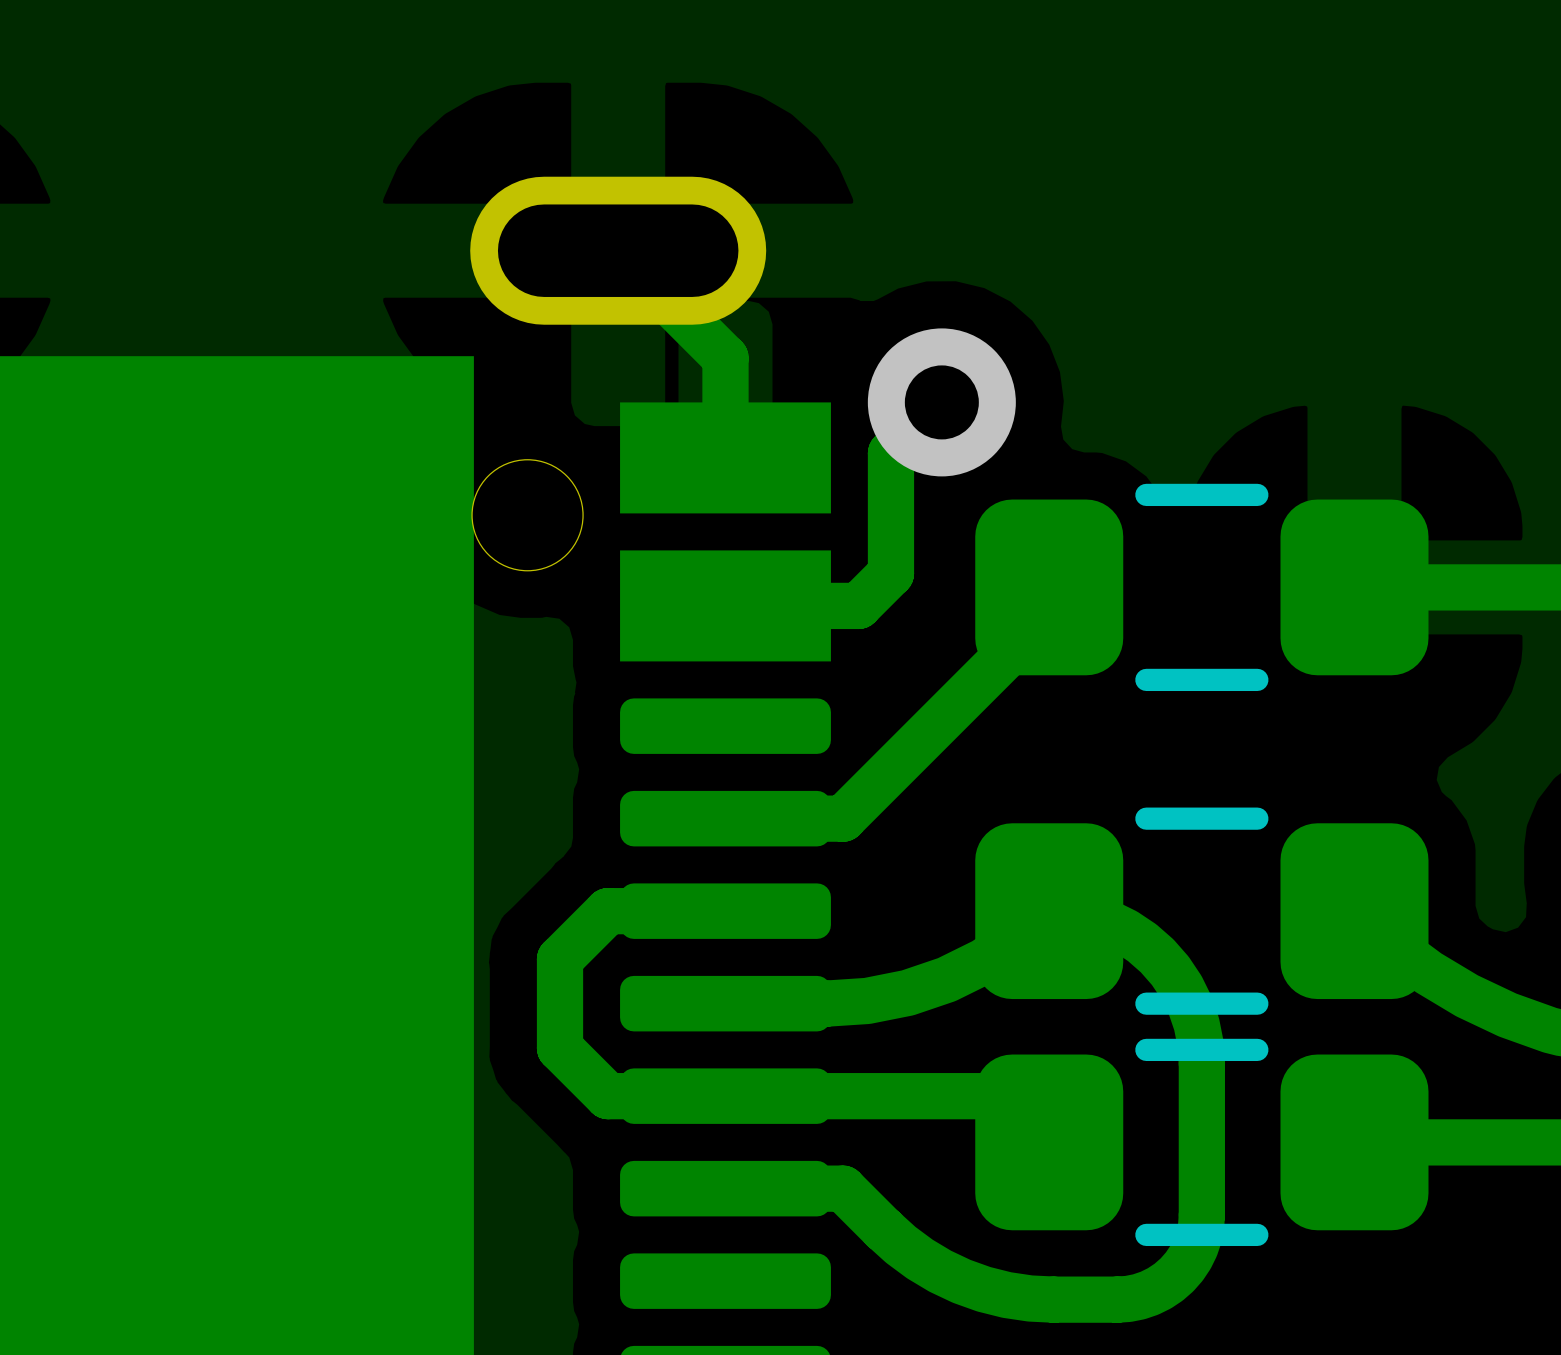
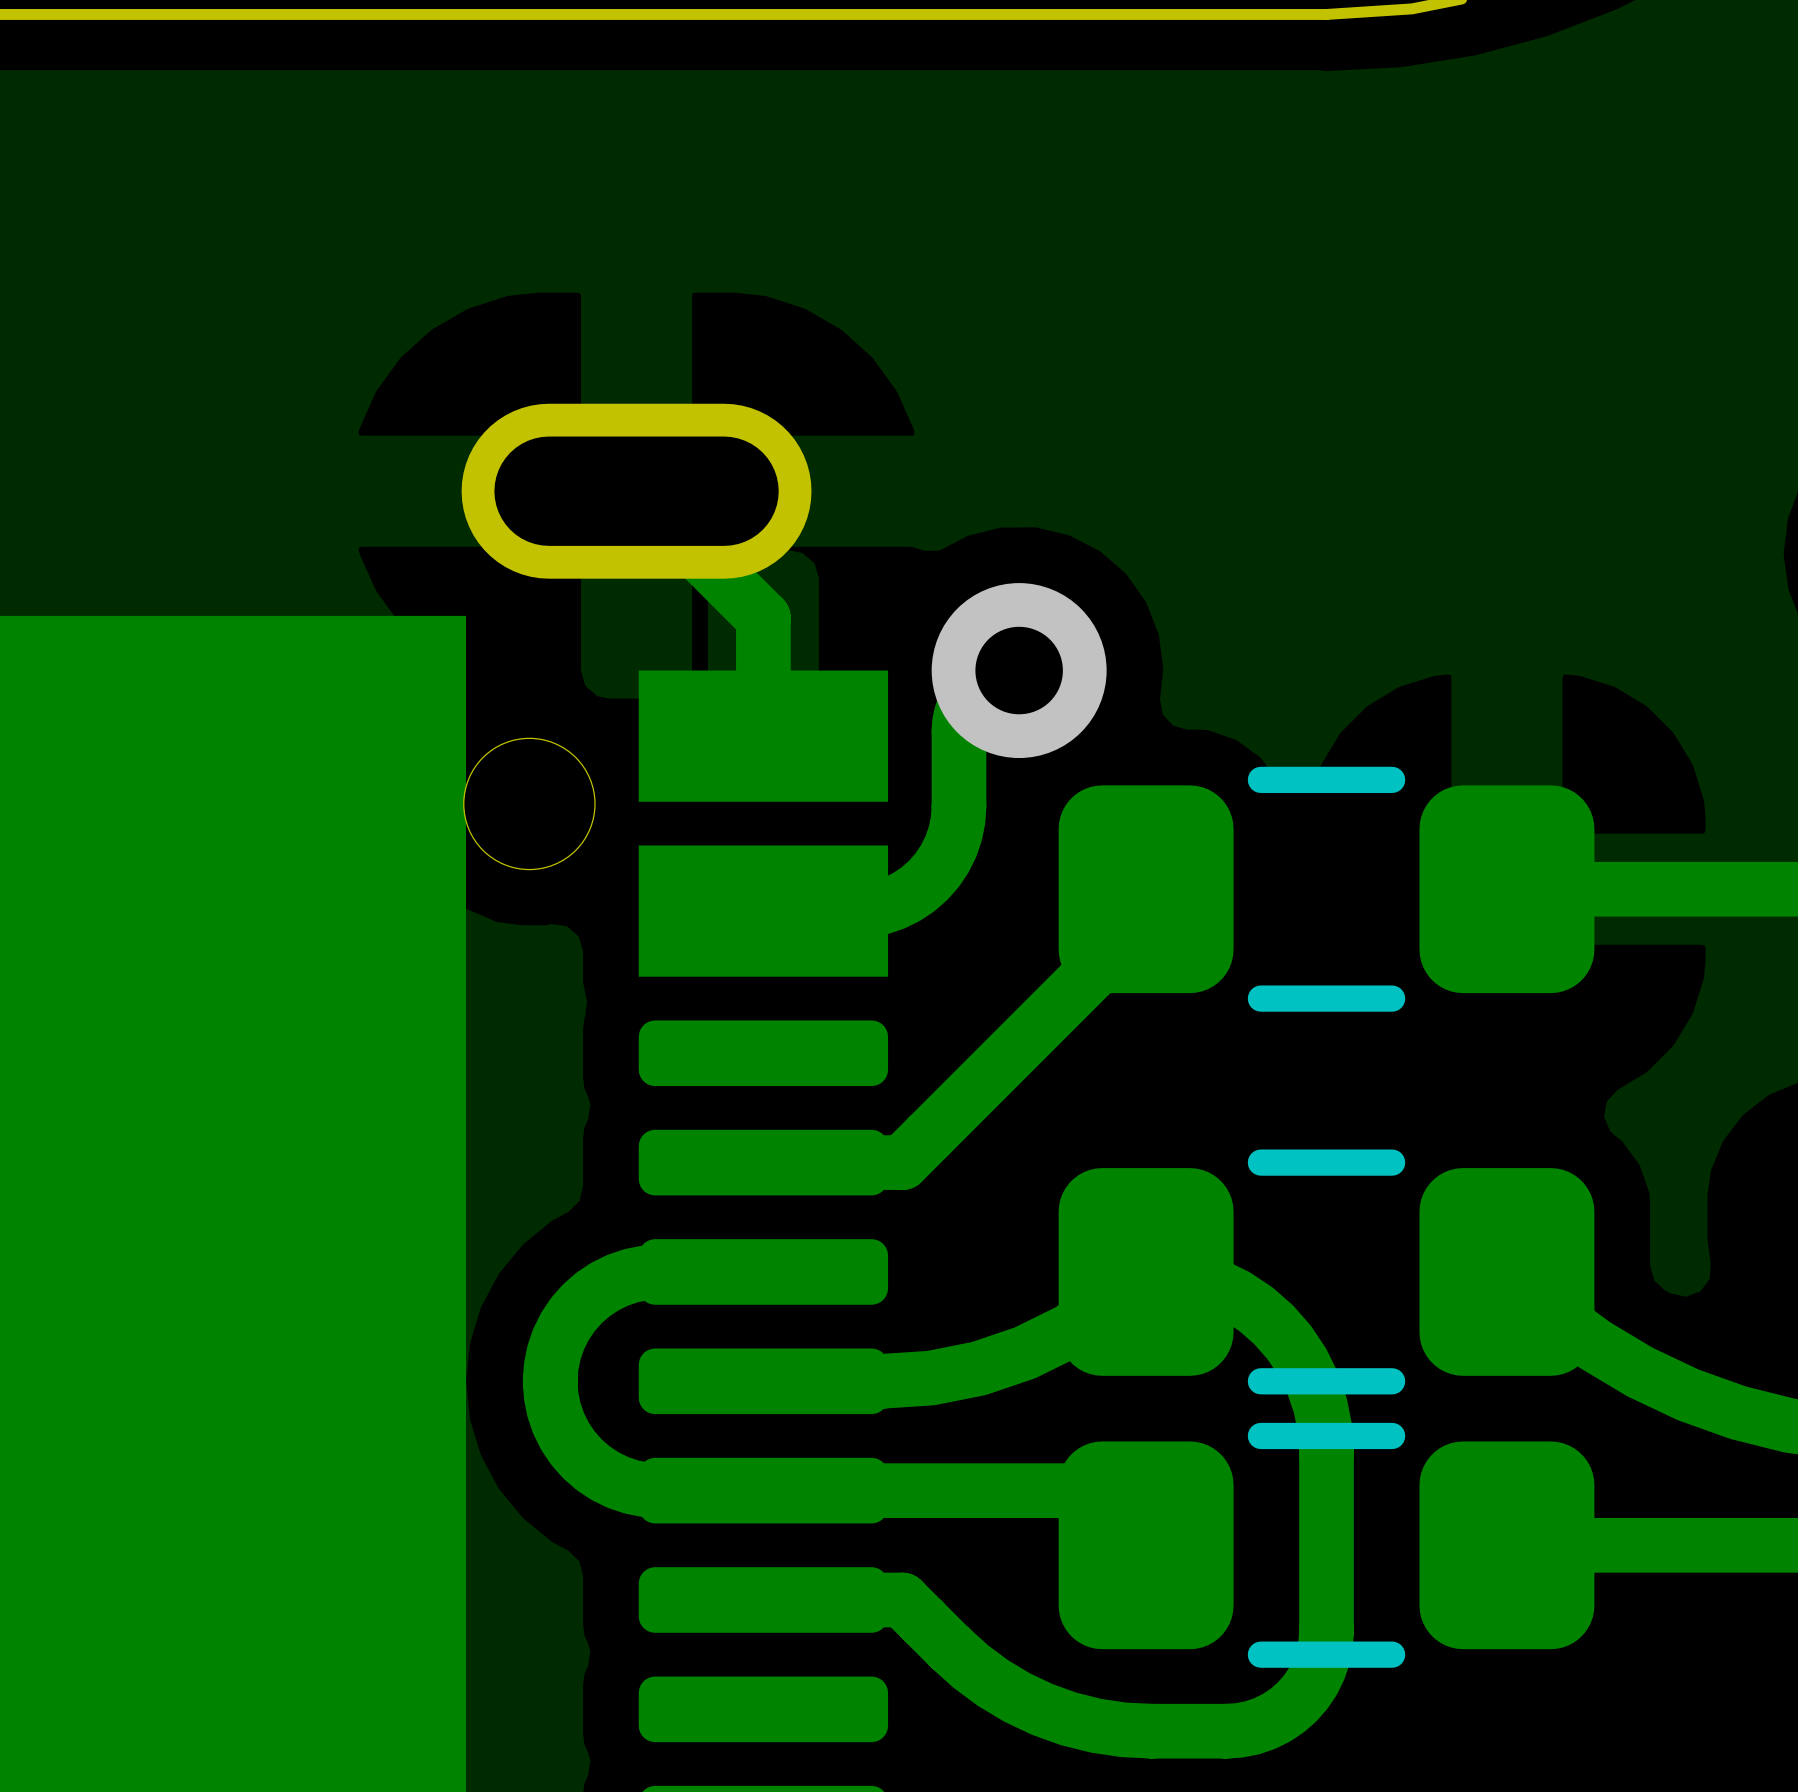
track: (890, 517) (890, 573) (858, 605) (802, 605) -> (959, 806) (955, 833) (951, 846) (944, 858) (928, 880) (906, 897) (894, 903) (867, 910) (853, 911)
track: (637, 911) (608, 911) (560, 959) (560, 1048) (608, 1096) (637, 1096) -> (659, 1271) (645, 1272) (617, 1280) (592, 1294) (582, 1303) (572, 1314) (558, 1339) (551, 1367) (550, 1381) (553, 1409) (558, 1423) (572, 1447) (582, 1458) (592, 1468) (617, 1482) (645, 1489) (659, 1490)

